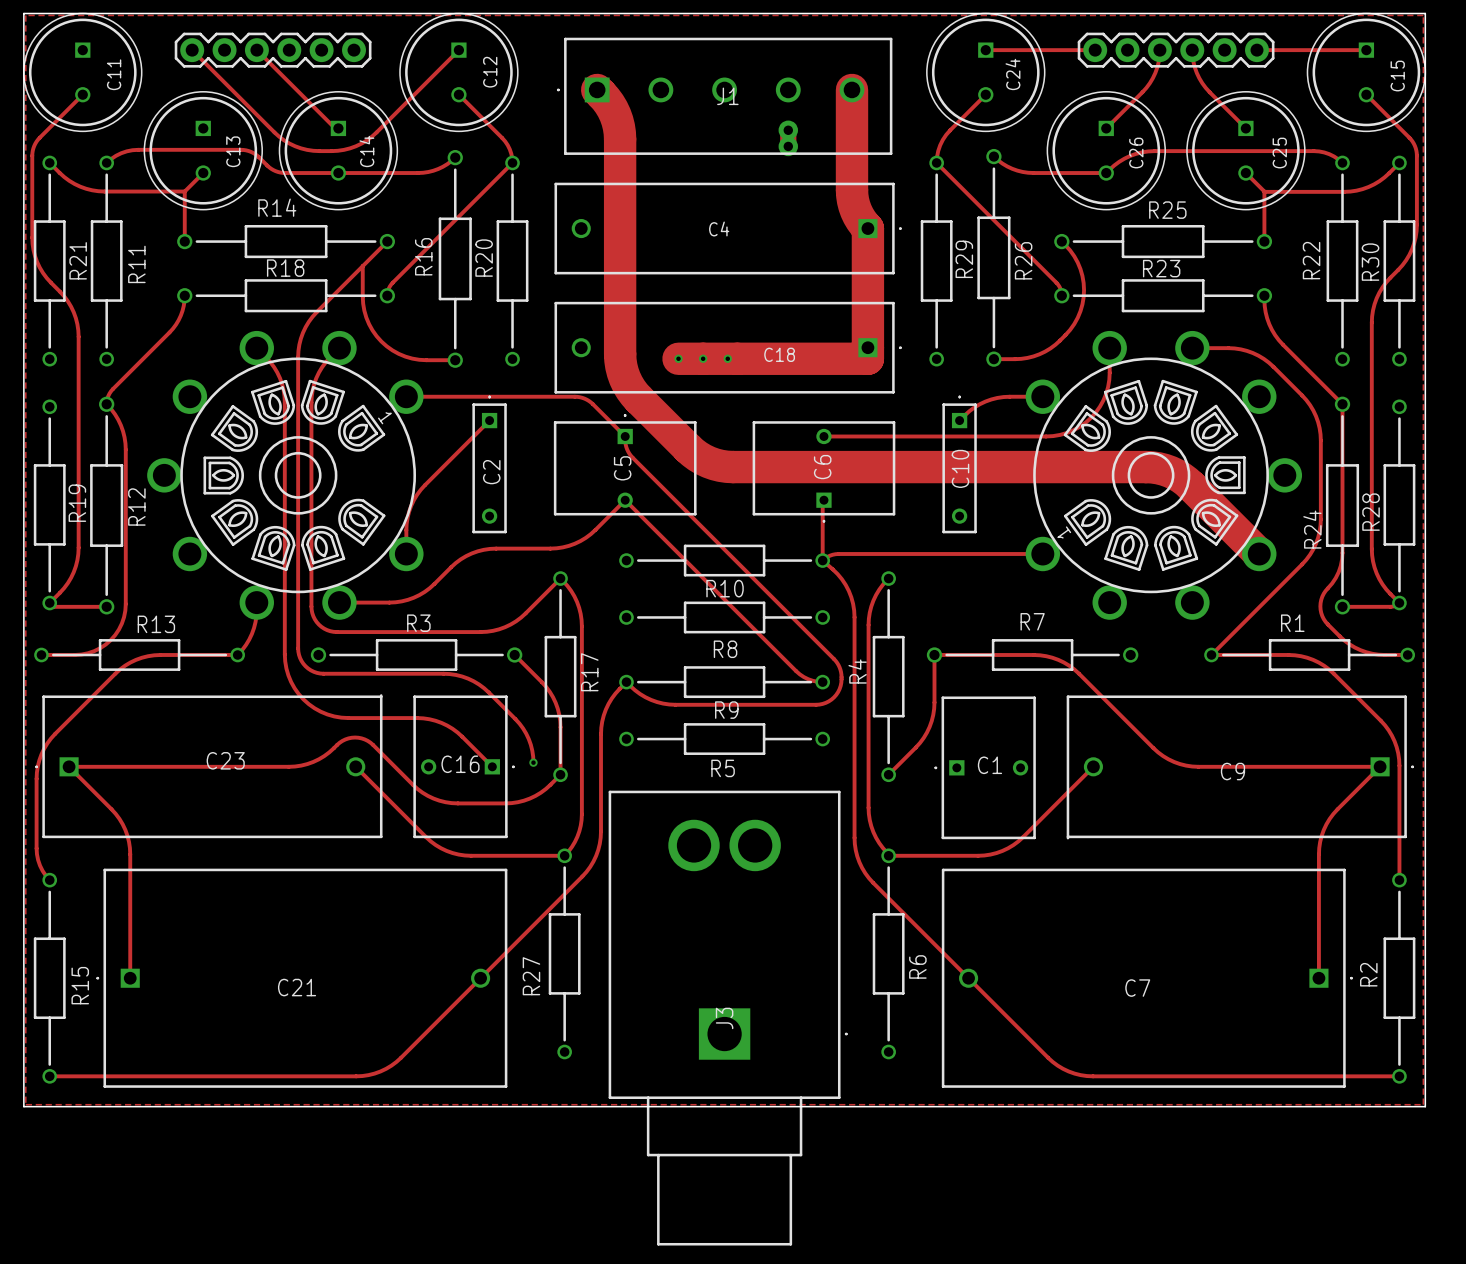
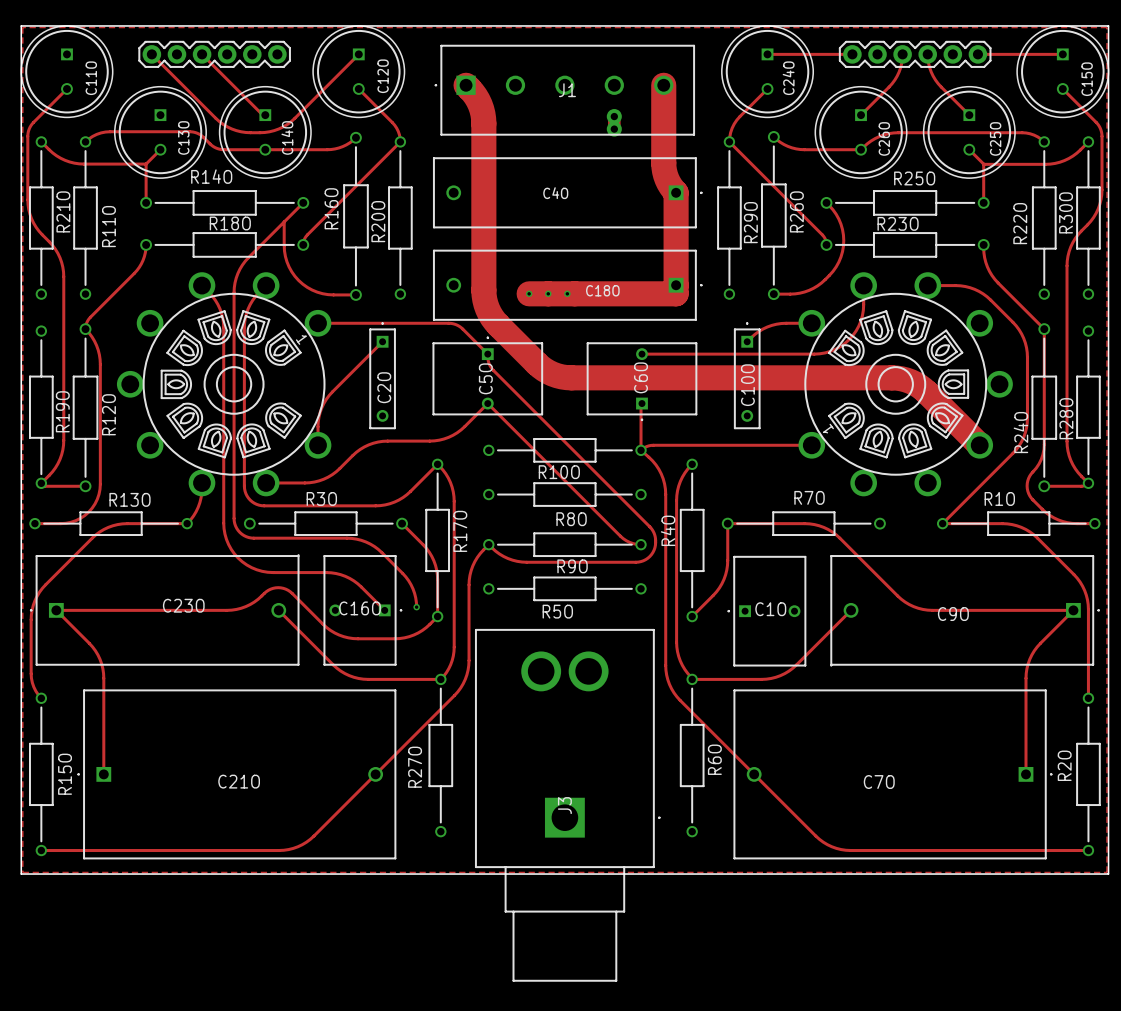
C12 name: C12 (490, 72) -> C12O (383, 76)
C11 name: C11 (114, 74) -> C11O (91, 78)
C24 name: C24 (1012, 74) -> C24O (788, 78)
C15 name: C15 (1397, 76) -> C15O (1087, 79)
C13 name: C13 (233, 151) -> C13O (183, 137)
C14 name: C14 (366, 151) -> C14O (287, 137)
C26 name: C26 (1136, 153) -> C26O (884, 138)
C25 name: C25 (1279, 153) -> C25O (995, 138)
R14 name: R14 (277, 207) -> R14O (211, 176)
R25 name: R25 (1167, 210) -> R25O (914, 178)
C4 name: C4 (719, 228) -> C4O (555, 193)
R16 name: R16 (423, 256) -> R16O (331, 208)
R20 name: R20 (484, 258) -> R20O (378, 221)
R29 name: R29 (964, 259) -> R29O (750, 222)
R21 name: R21 (78, 260) -> R21O (63, 211)
R26 name: R26 (1023, 260) -> R26O (796, 211)
R22 name: R22 (1311, 260) -> R22O (1020, 223)
R30 name: R30 (1370, 262) -> R30O (1066, 212)
R11 name: R11 (136, 264) -> R11O (108, 226)
R18 name: R18 (285, 268) -> R18O (230, 223)
R23 name: R23 (1161, 268) -> R23O (898, 223)
C18 name: C18 (779, 354) -> C18O (602, 290)
C6 name: C6 (822, 467) -> C6O (641, 377)
C5 name: C5 (622, 468) -> C5O (485, 378)
C10 name: C10 (960, 468) -> C10O (747, 385)
C2 name: C2 (491, 472) -> C2O (384, 387)
R19 name: R19 (77, 503) -> R19O (62, 411)
R12 name: R12 (136, 507) -> R12O (108, 414)
R28 name: R28 (1371, 512) -> R28O (1066, 418)
R24 name: R24 (1312, 529) -> R24O (1020, 432)
R10 name: R10 (725, 588) -> R10O (559, 472)
R7 name: R7 (1032, 621) -> R7O (809, 497)
R3 name: R3 (418, 623) -> R3O (321, 498)
R1 name: R1 (1292, 623) -> R1O (999, 498)
R13 name: R13 (156, 624) -> R13O (130, 499)
R8 name: R8 (725, 649) -> R8O (571, 519)
R4 name: R4 (857, 671) -> R4O (668, 530)
R17 name: R17 (589, 672) -> R17O (460, 531)
R9 name: R9 (726, 710) -> R9O (572, 566)
C23 name: C23 (225, 760) -> C23O (183, 605)
C16 name: C16 (460, 764) -> C16O (360, 608)
C1 name: C1 (989, 765) -> C1O (770, 609)
R5 name: R5 (723, 768) -> R5O (557, 611)
C9 name: C9 (1232, 771) -> C9O (953, 614)
R6 name: R6 (917, 966) -> R6O (714, 759)
R2 name: R2 (1368, 974) -> R2O (1064, 765)
R27 name: R27 (531, 976) -> R27O (415, 767)
R15 name: R15 (80, 985) -> R15O (65, 774)
C21 name: C21 (297, 987) -> C21O (239, 781)
C7 name: C7 (1137, 988) -> C7O (879, 782)

